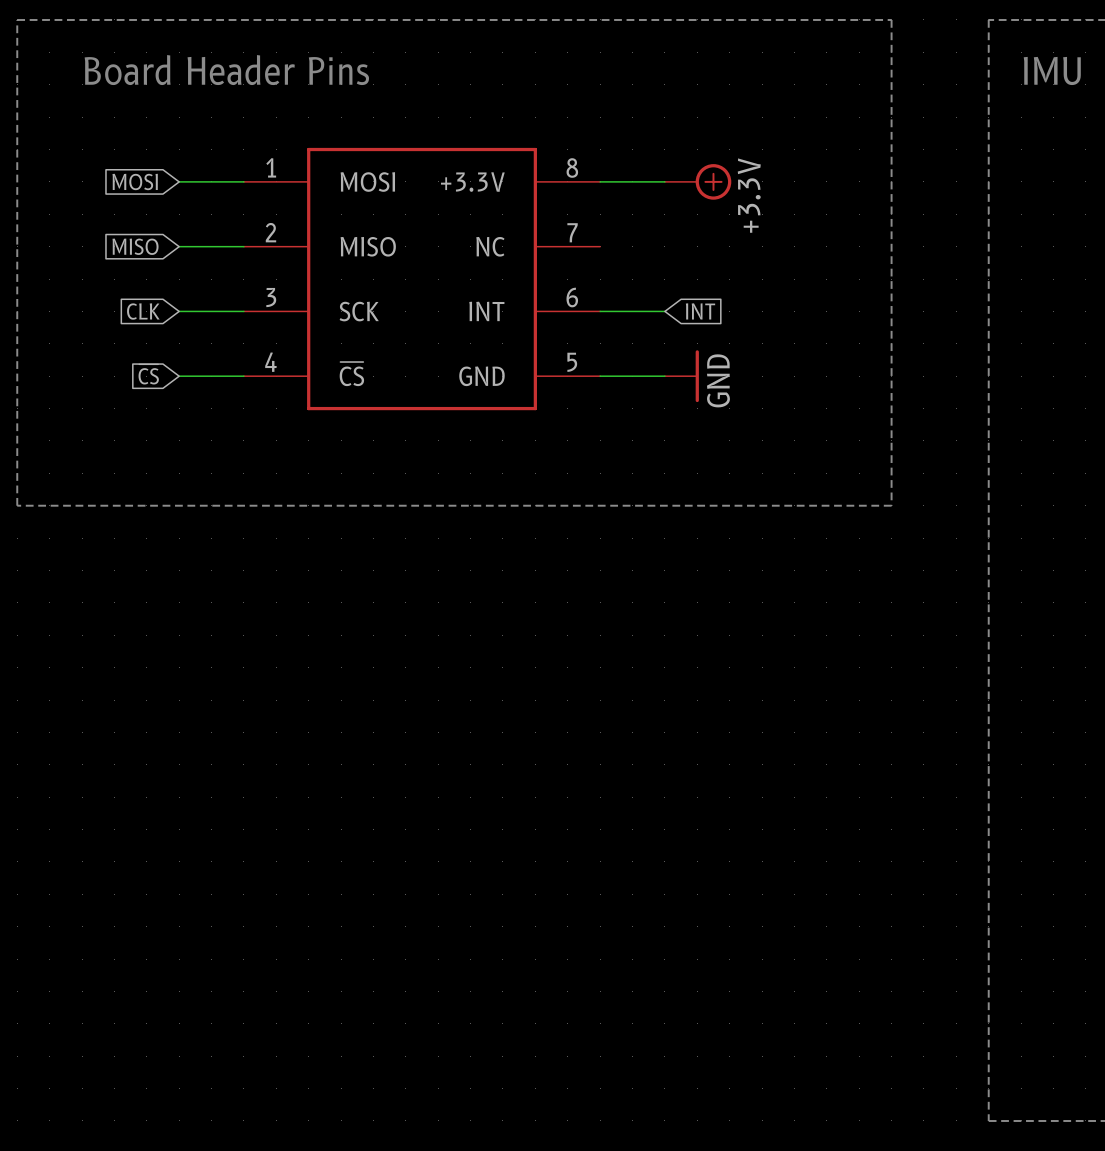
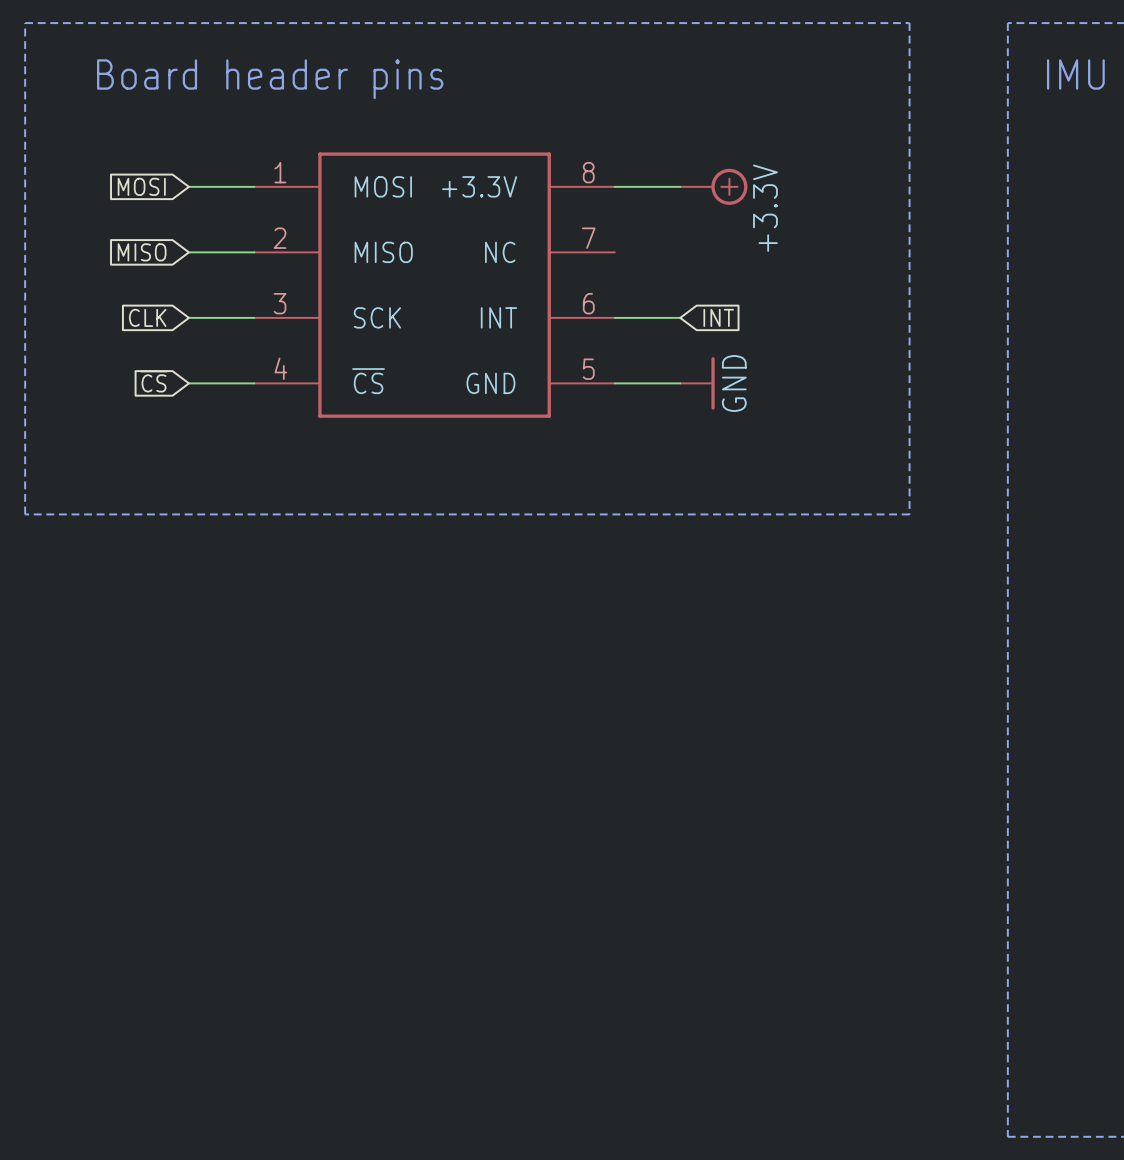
text: Board Header Pins (226, 70) -> Board header pins (270, 79)

